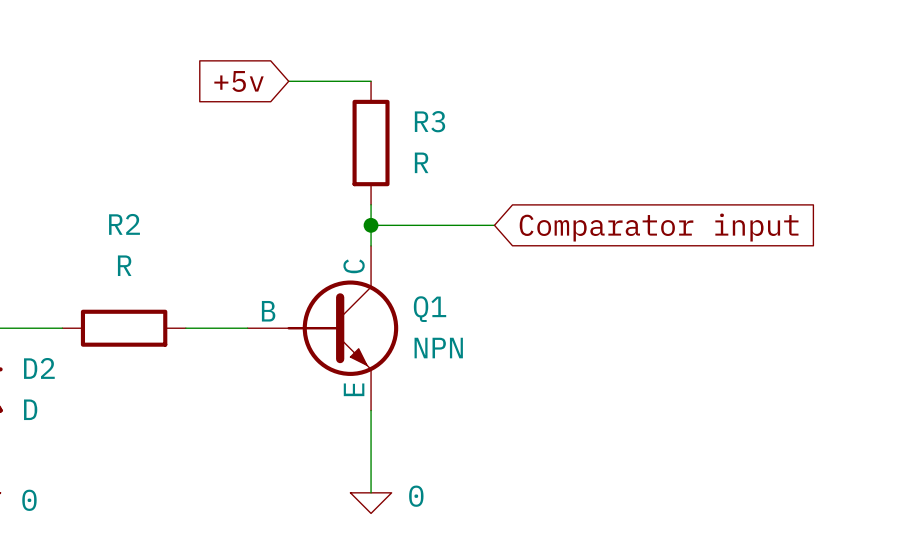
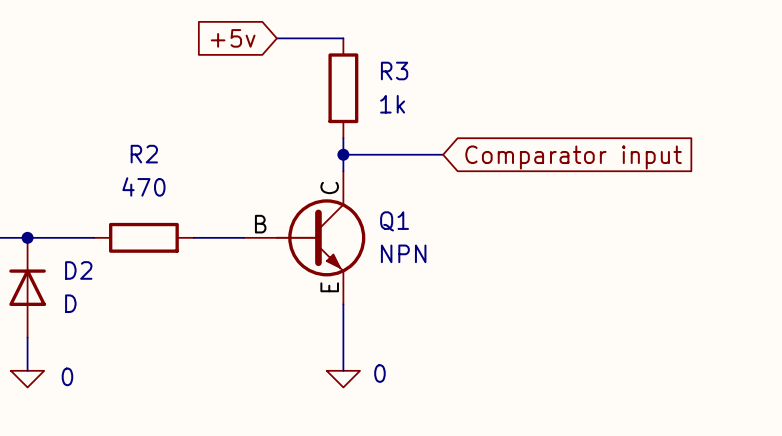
R3 value: R (421, 162) -> 1k (392, 104)
R2 value: R (124, 265) -> 470 (143, 186)

